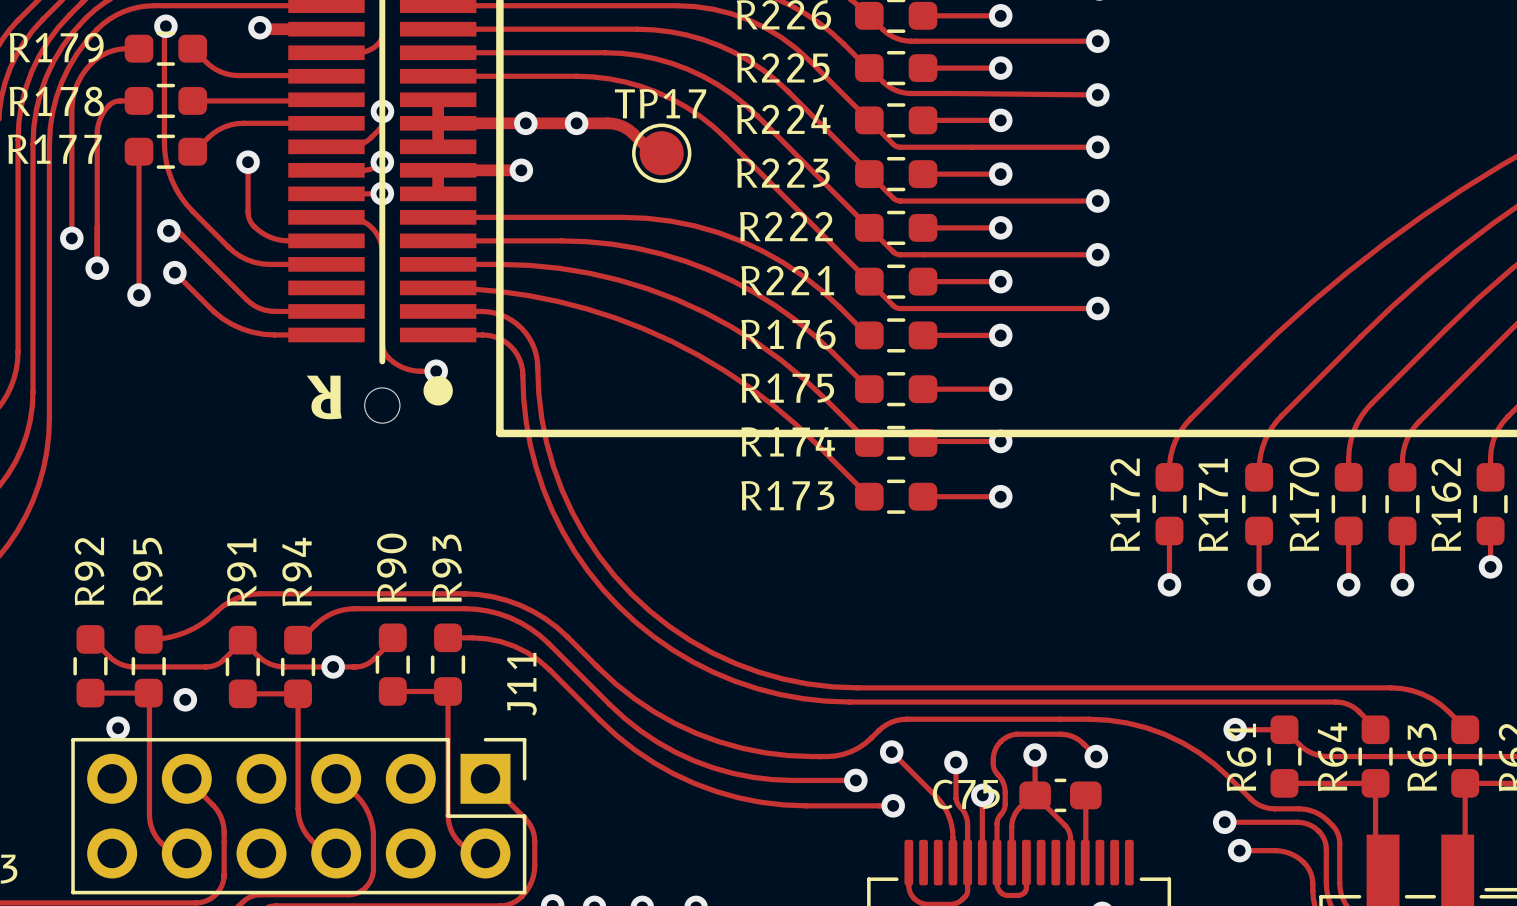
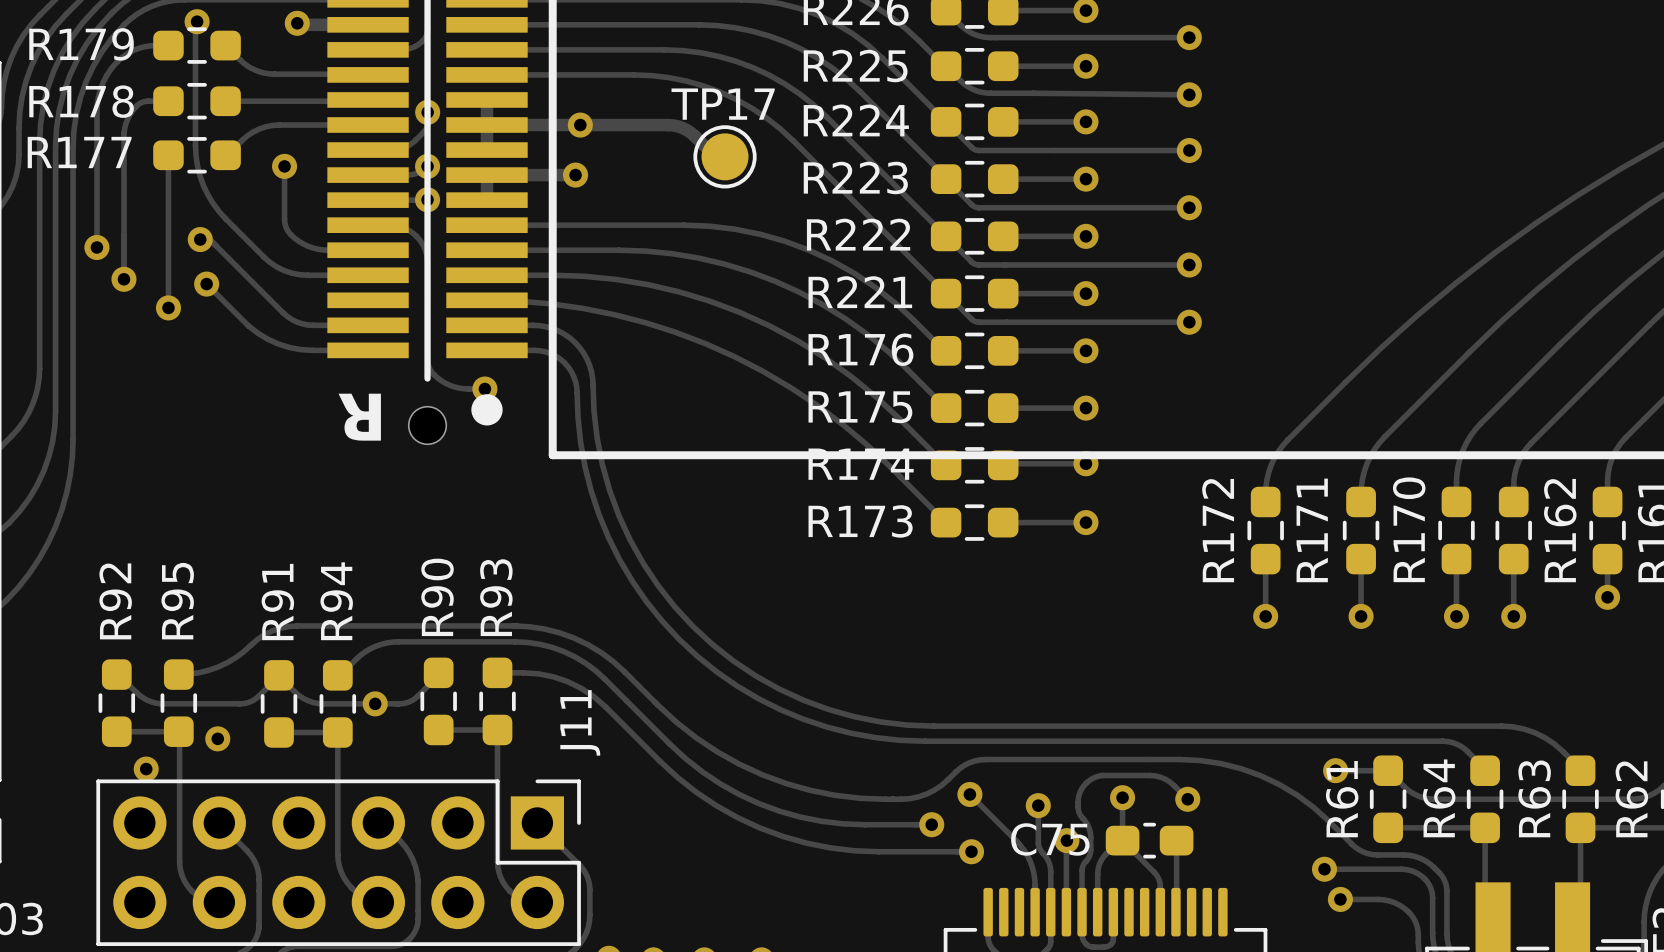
via: (576, 123) -> none

